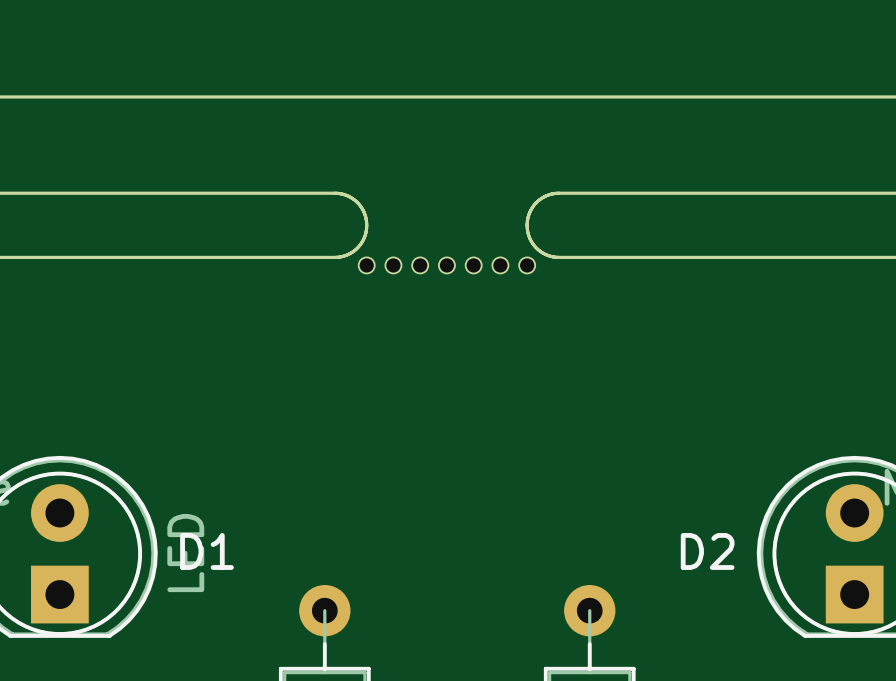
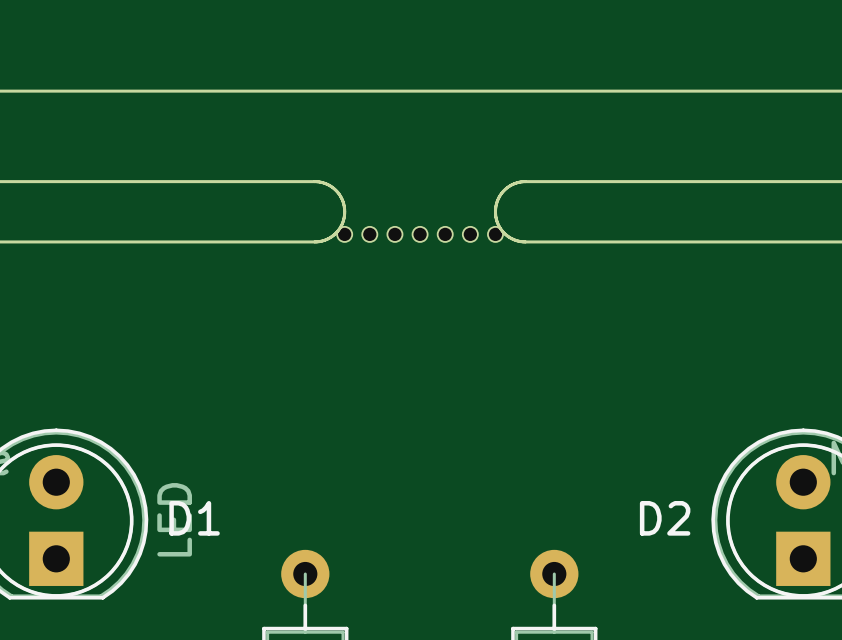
part: none -> (344, 234)
part: none -> (369, 234)
part: none -> (394, 234)
part: none -> (420, 234)
part: none -> (445, 234)
part: none -> (470, 234)
part: none -> (495, 234)
part: (366, 265) -> none
part: (393, 265) -> none
part: (420, 265) -> none
part: (446, 265) -> none
part: (473, 265) -> none
part: (500, 265) -> none
part: (527, 265) -> none

